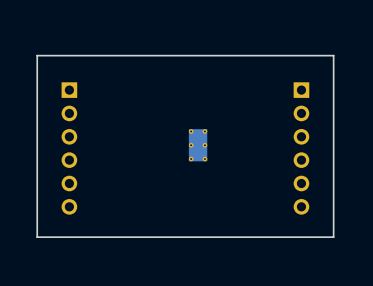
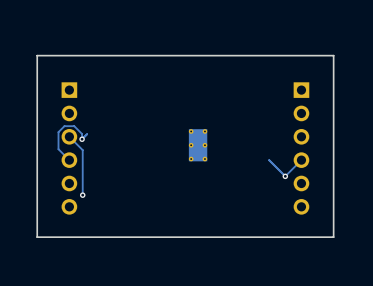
track: none -> (87, 134) (82, 139) (82, 133) (74, 126) (64, 126) (58, 132) (58, 149) (69, 160)
track: none -> (69, 136) (82, 150) (82, 195)
via: none -> (82, 139)
track: none -> (301, 160) (285, 176) (269, 160)
via: none -> (285, 176)
via: none -> (82, 195)

